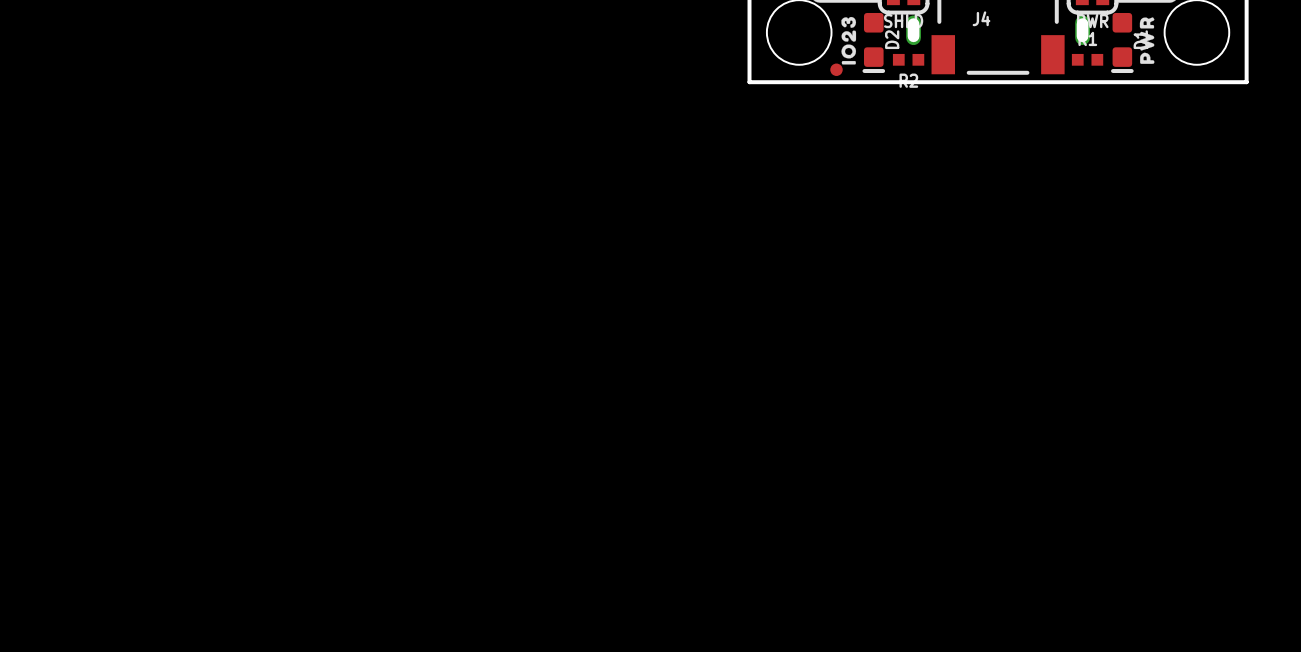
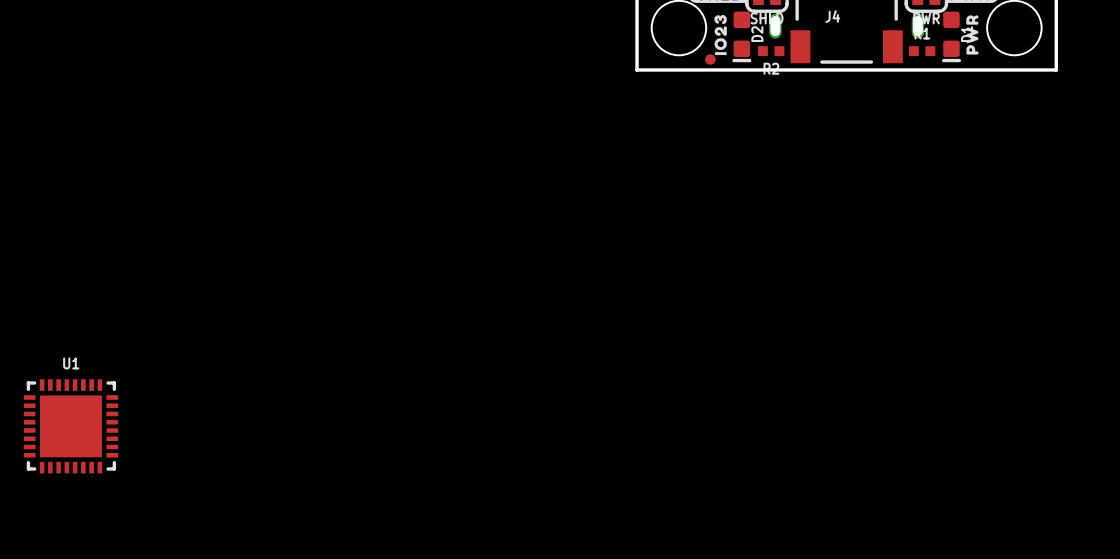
U1: none -> (70, 426)

